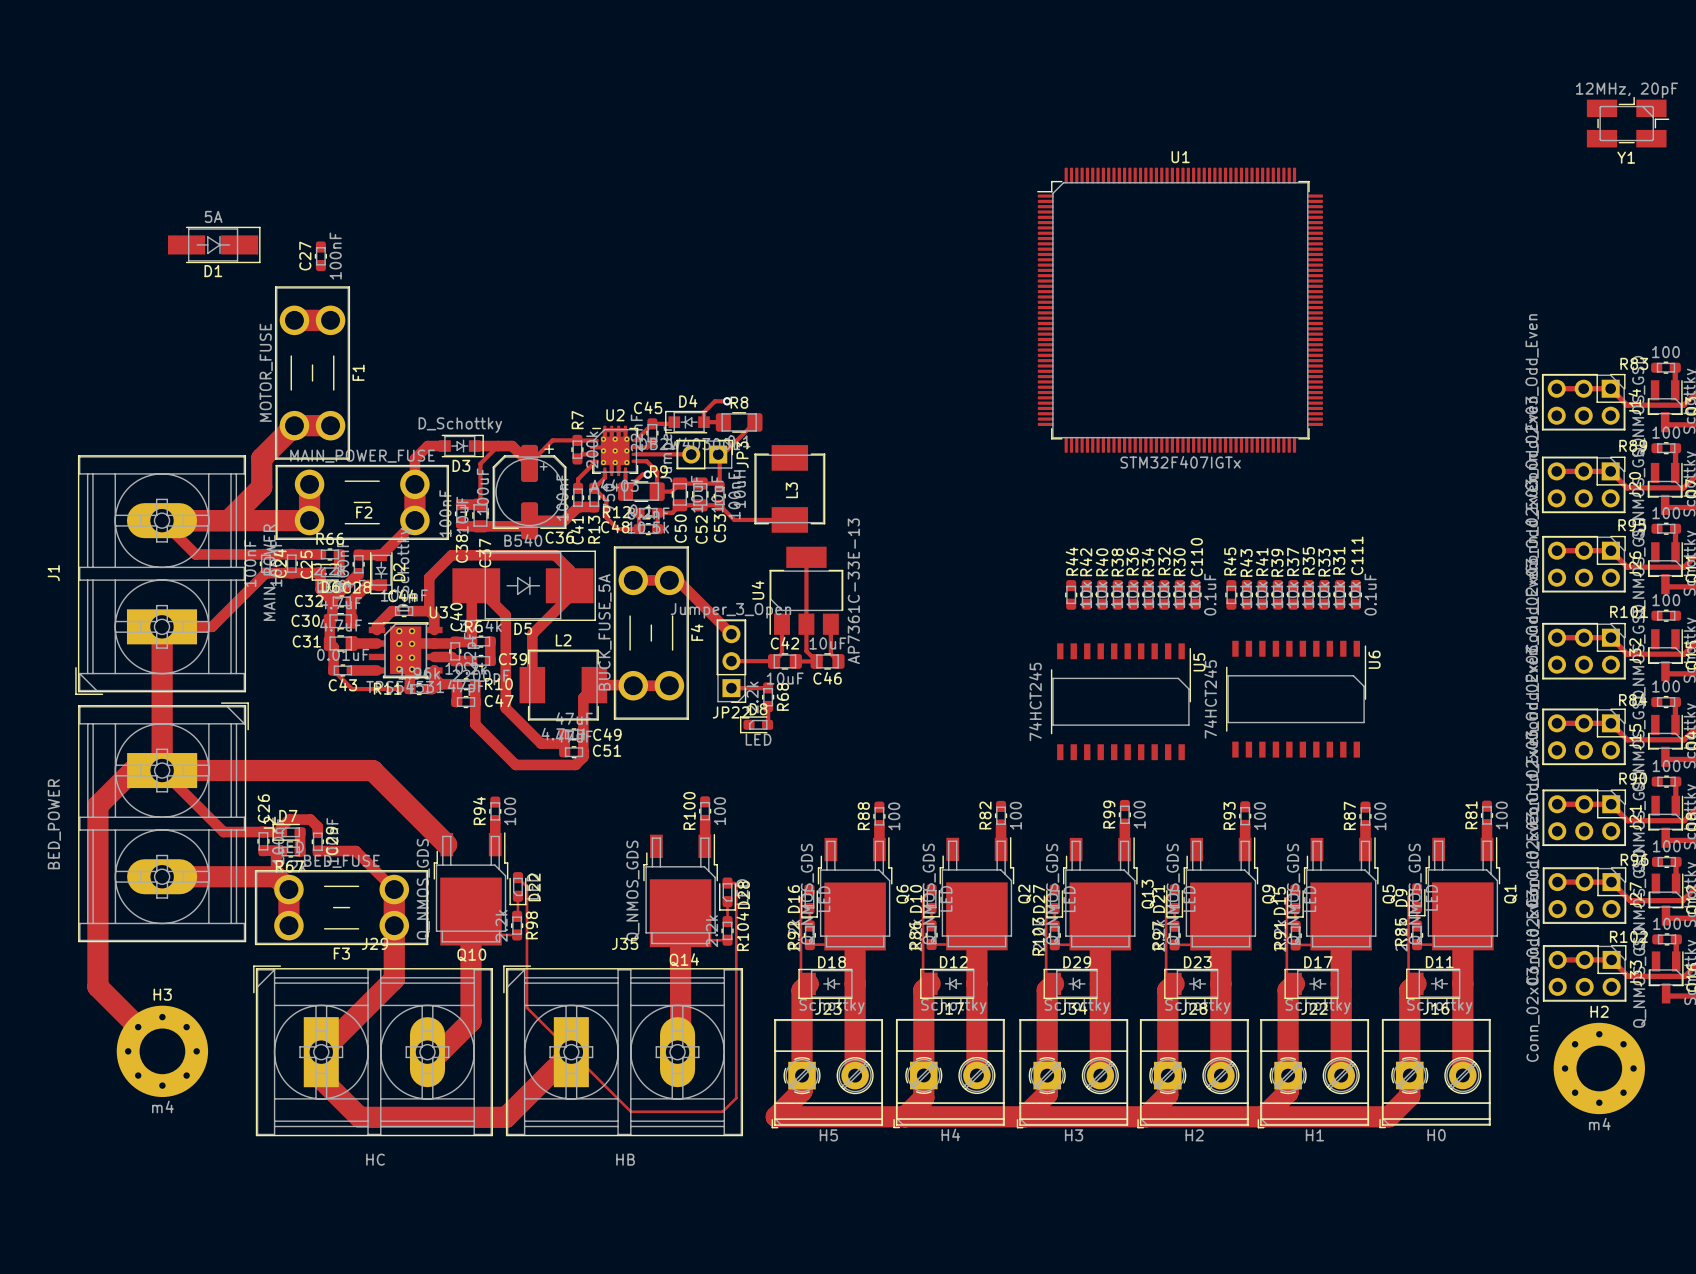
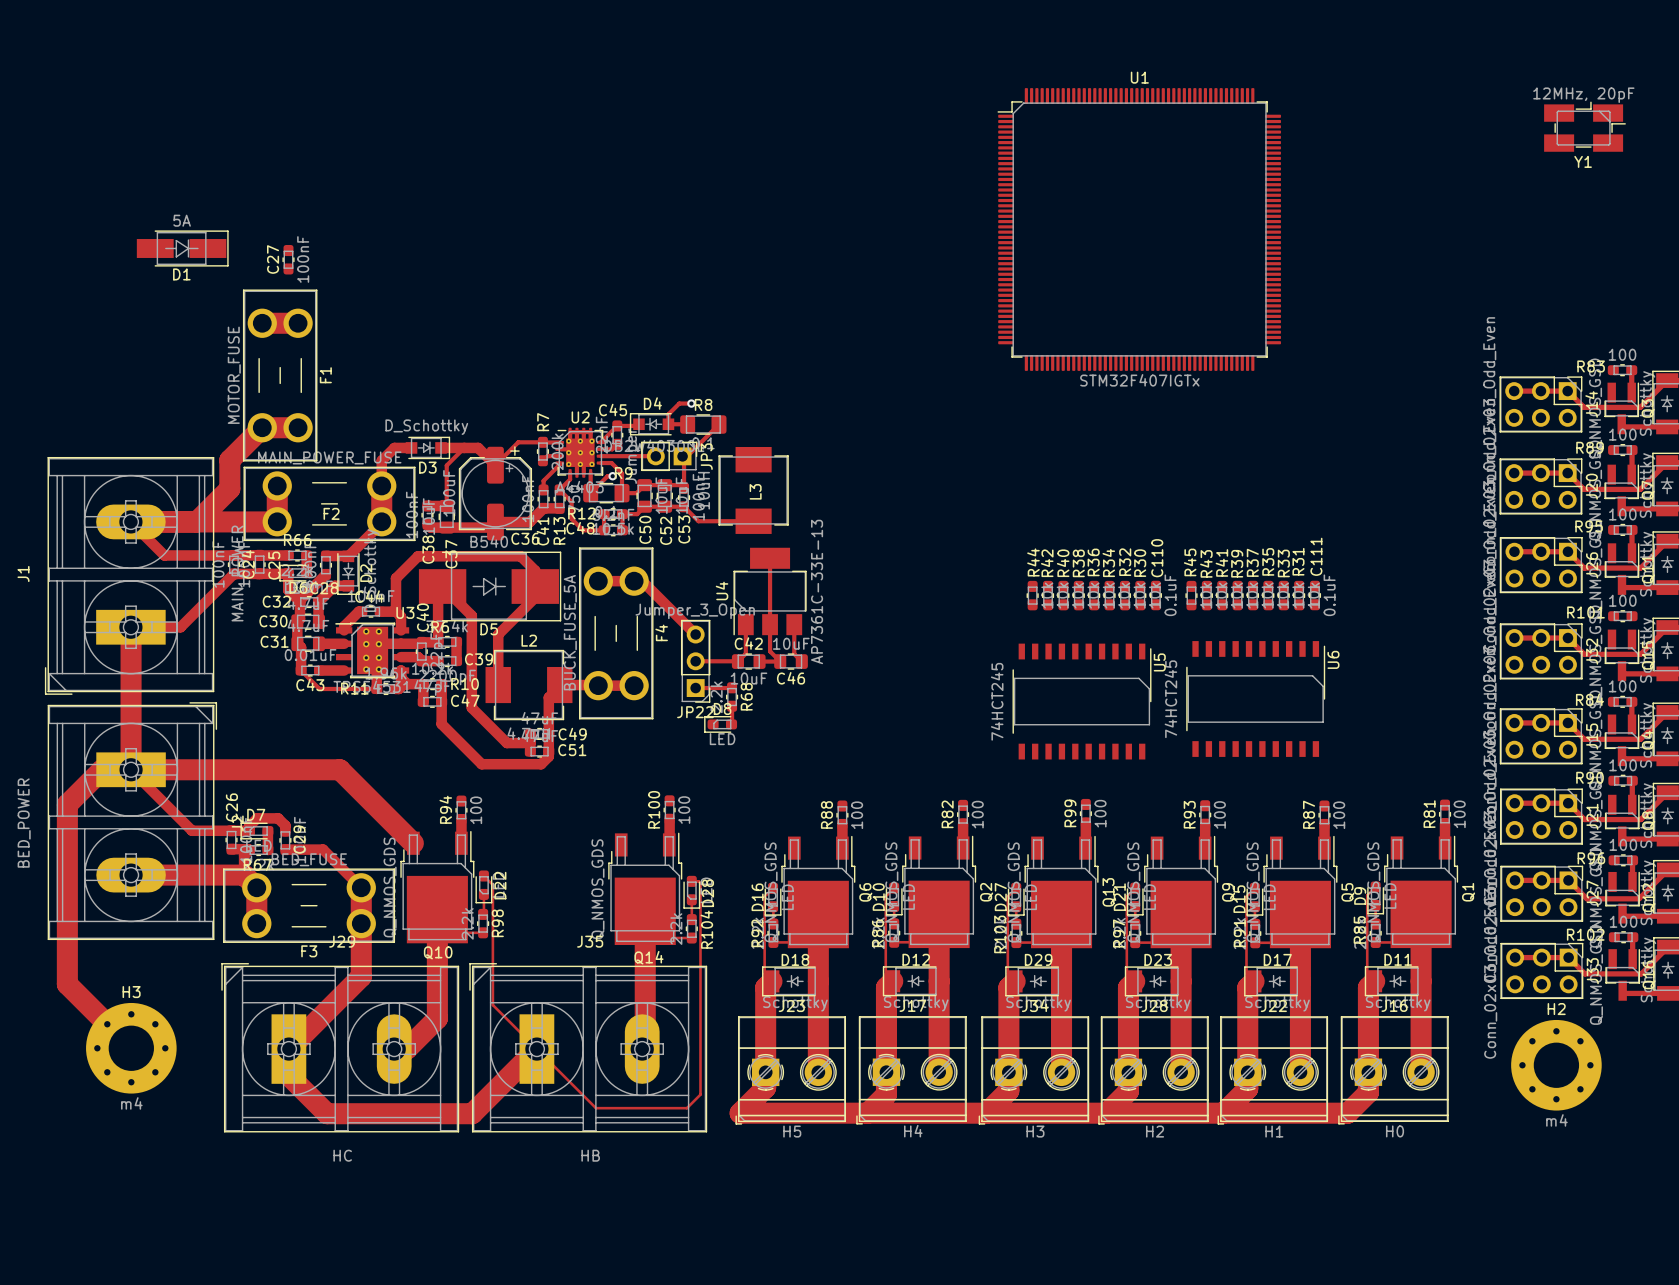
U1 position: (1180, 310) -> (1139, 229)

